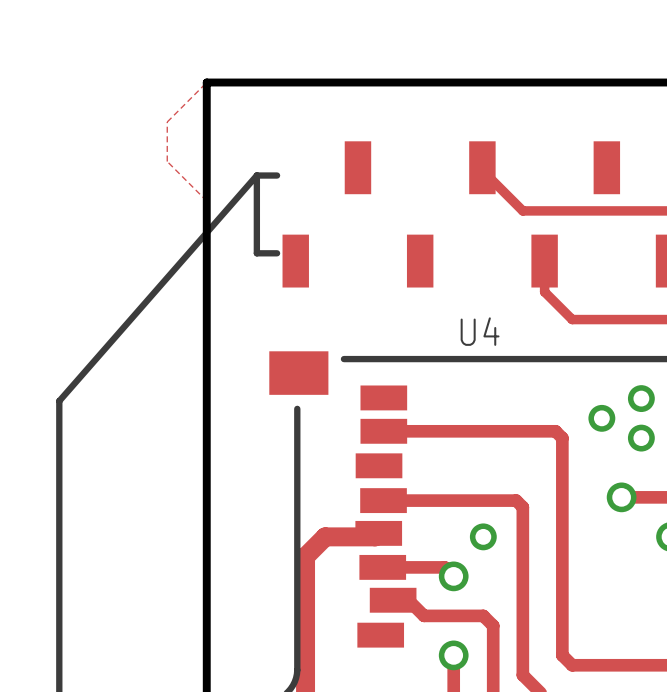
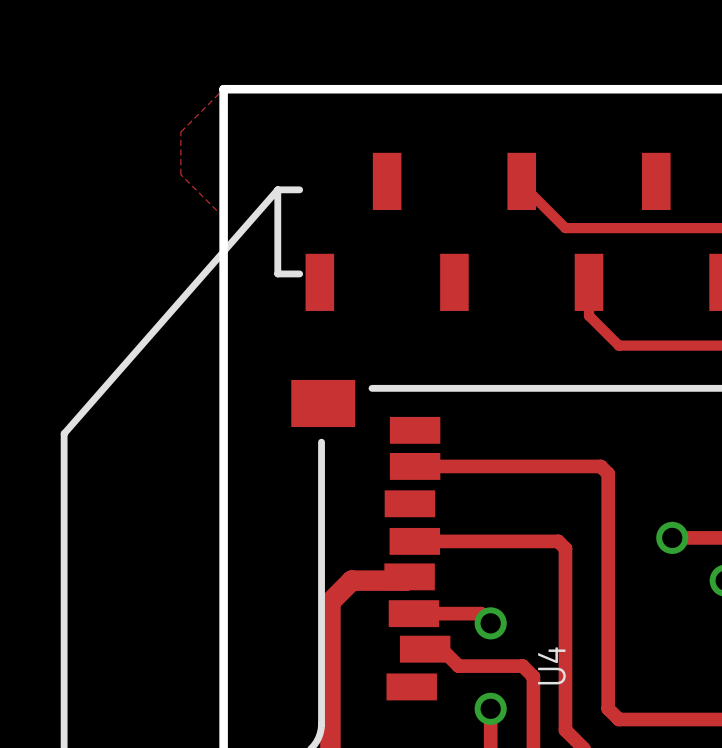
U4 name rotation: 0° (480, 331) -> 90° counterclockwise (551, 665)
U4 name position: U4 (480, 331) -> U4 (551, 665)
via: (641, 398) -> none
via: (601, 418) -> none
via: (641, 438) -> none
via: (483, 536) -> none

